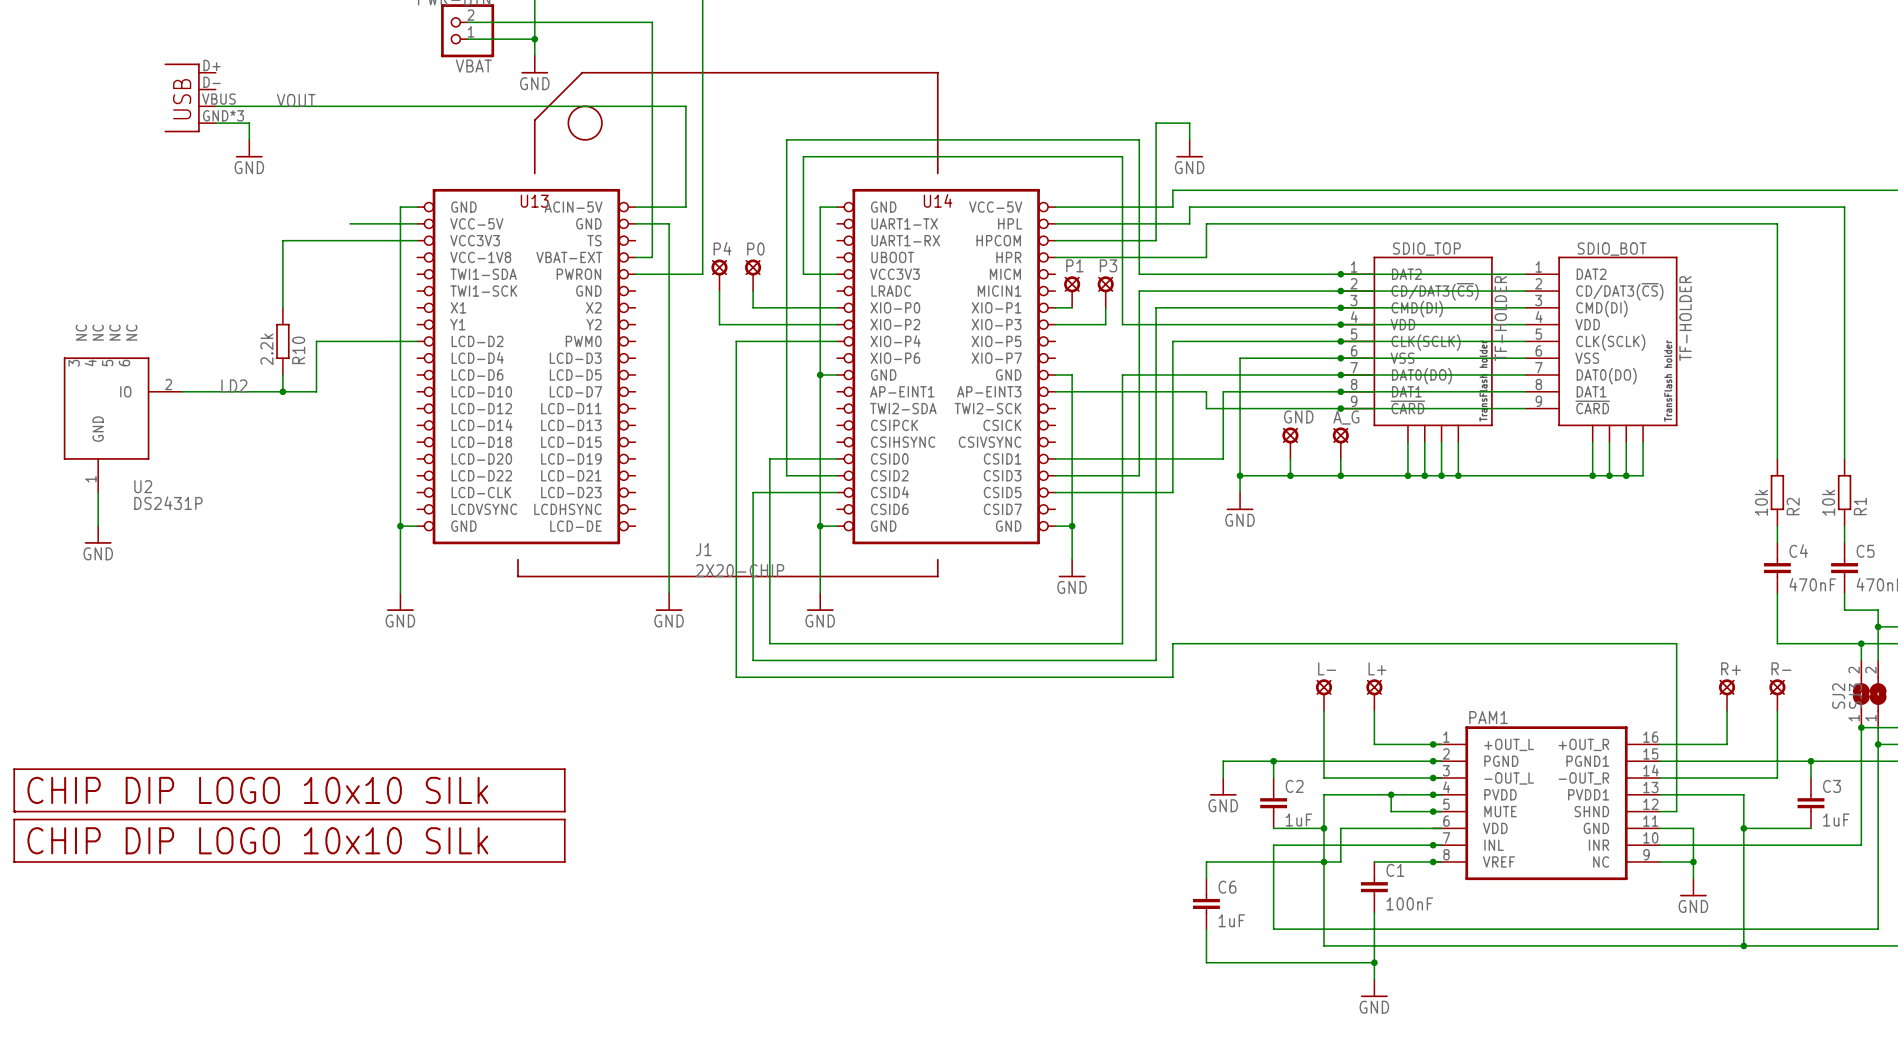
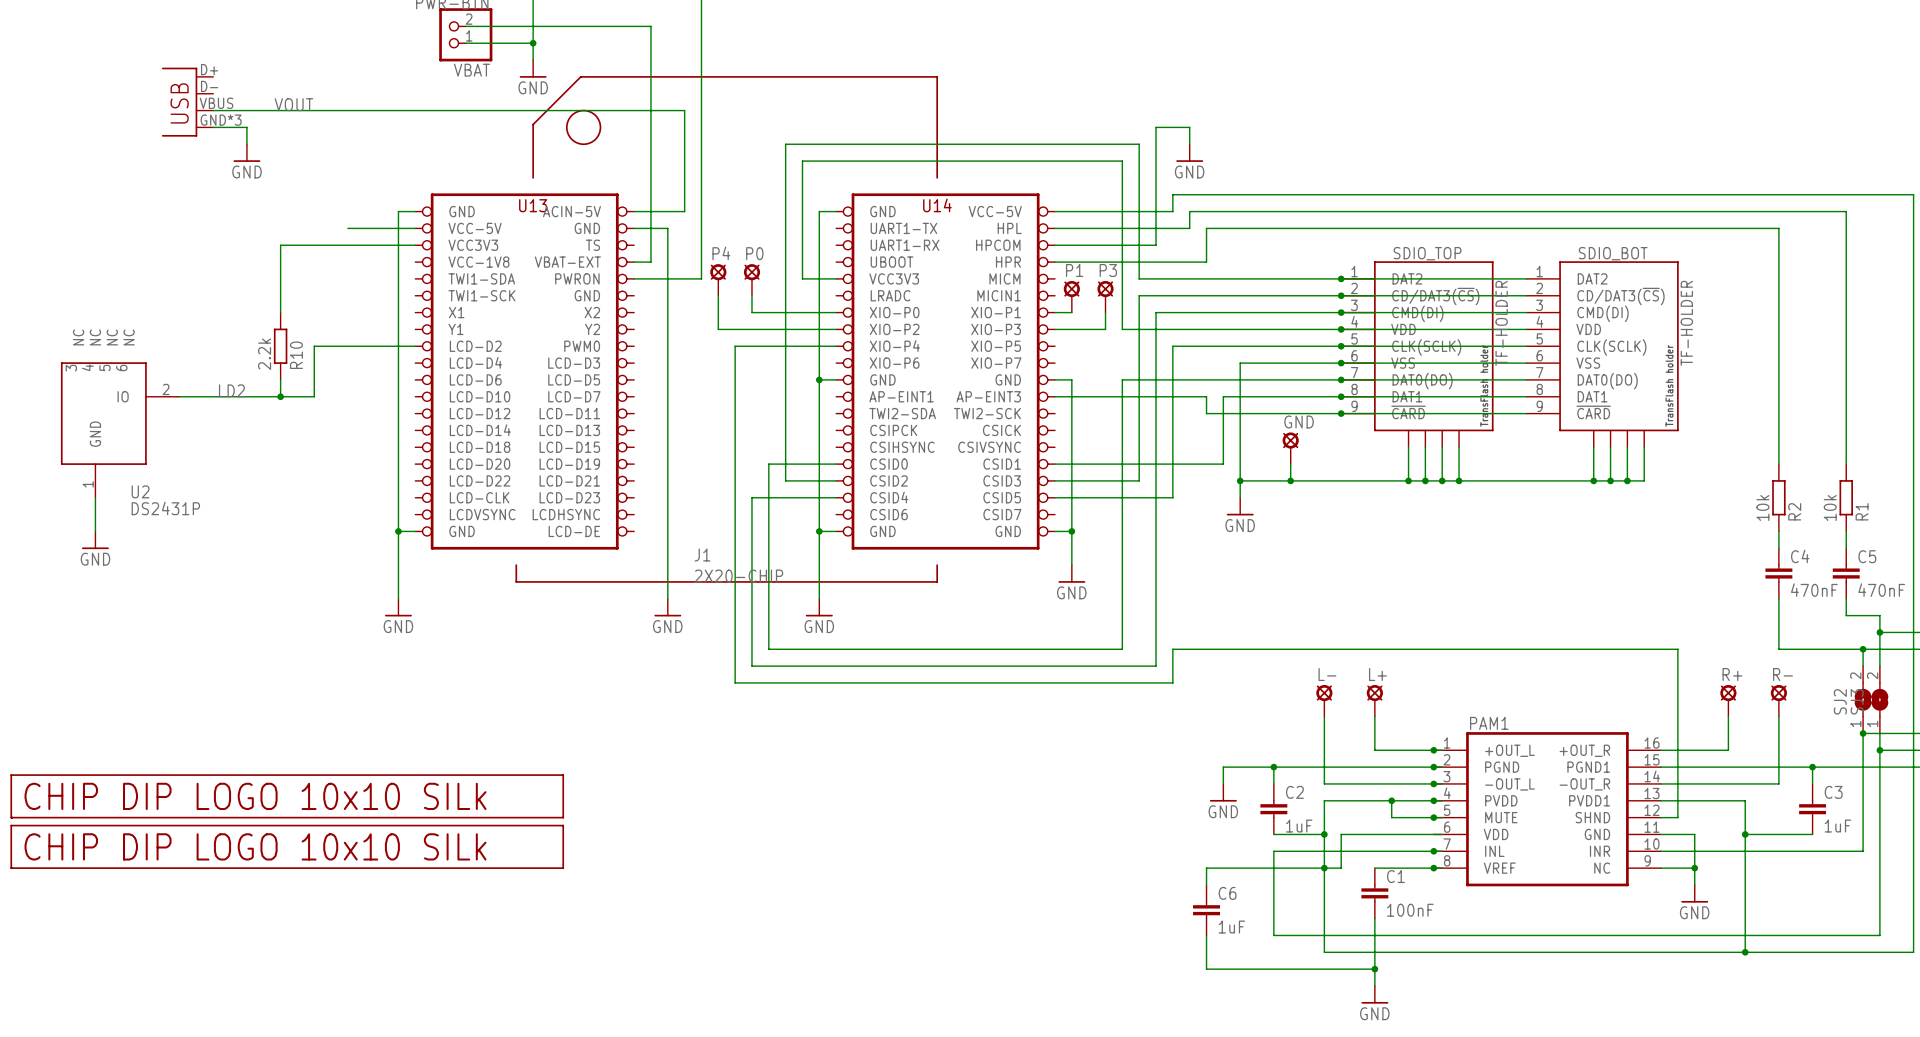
A_G: (1340, 443) -> none
wire: (1340, 458) (1340, 475) -> none
junction: (1340, 475) -> none

